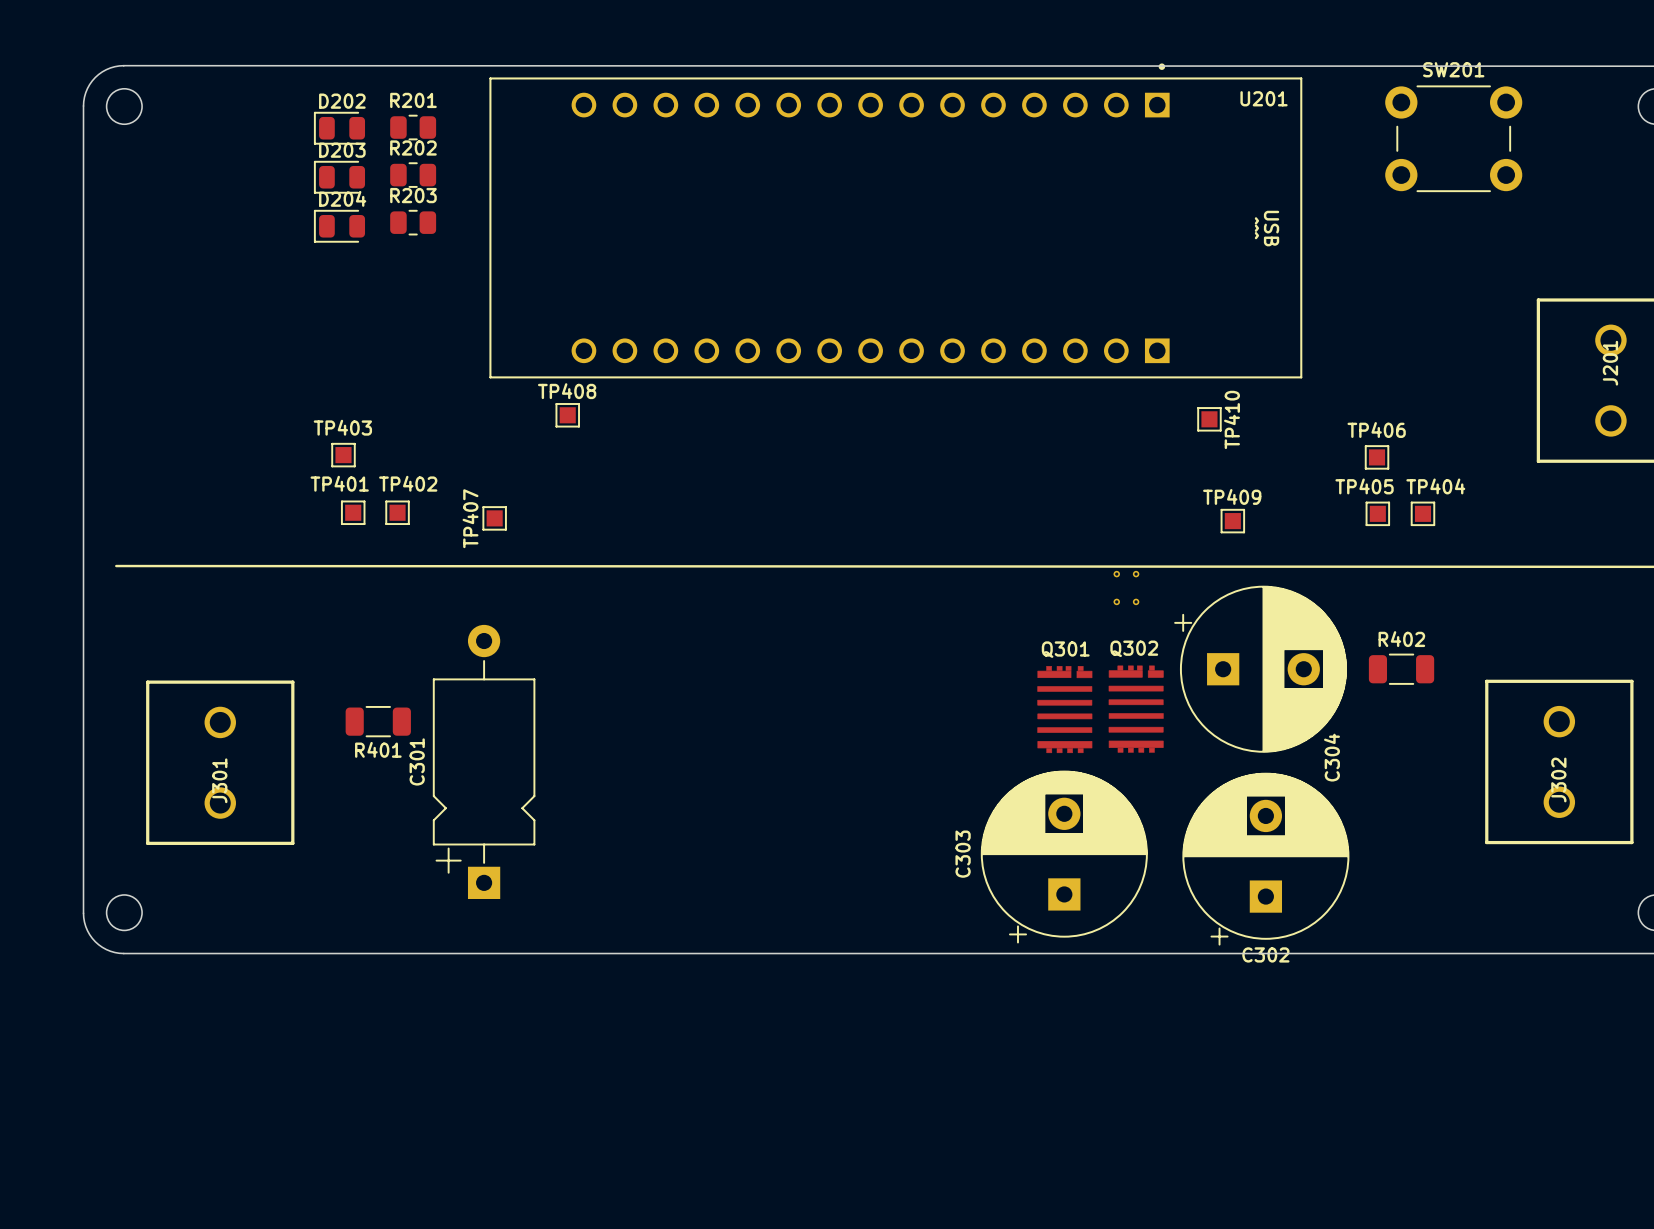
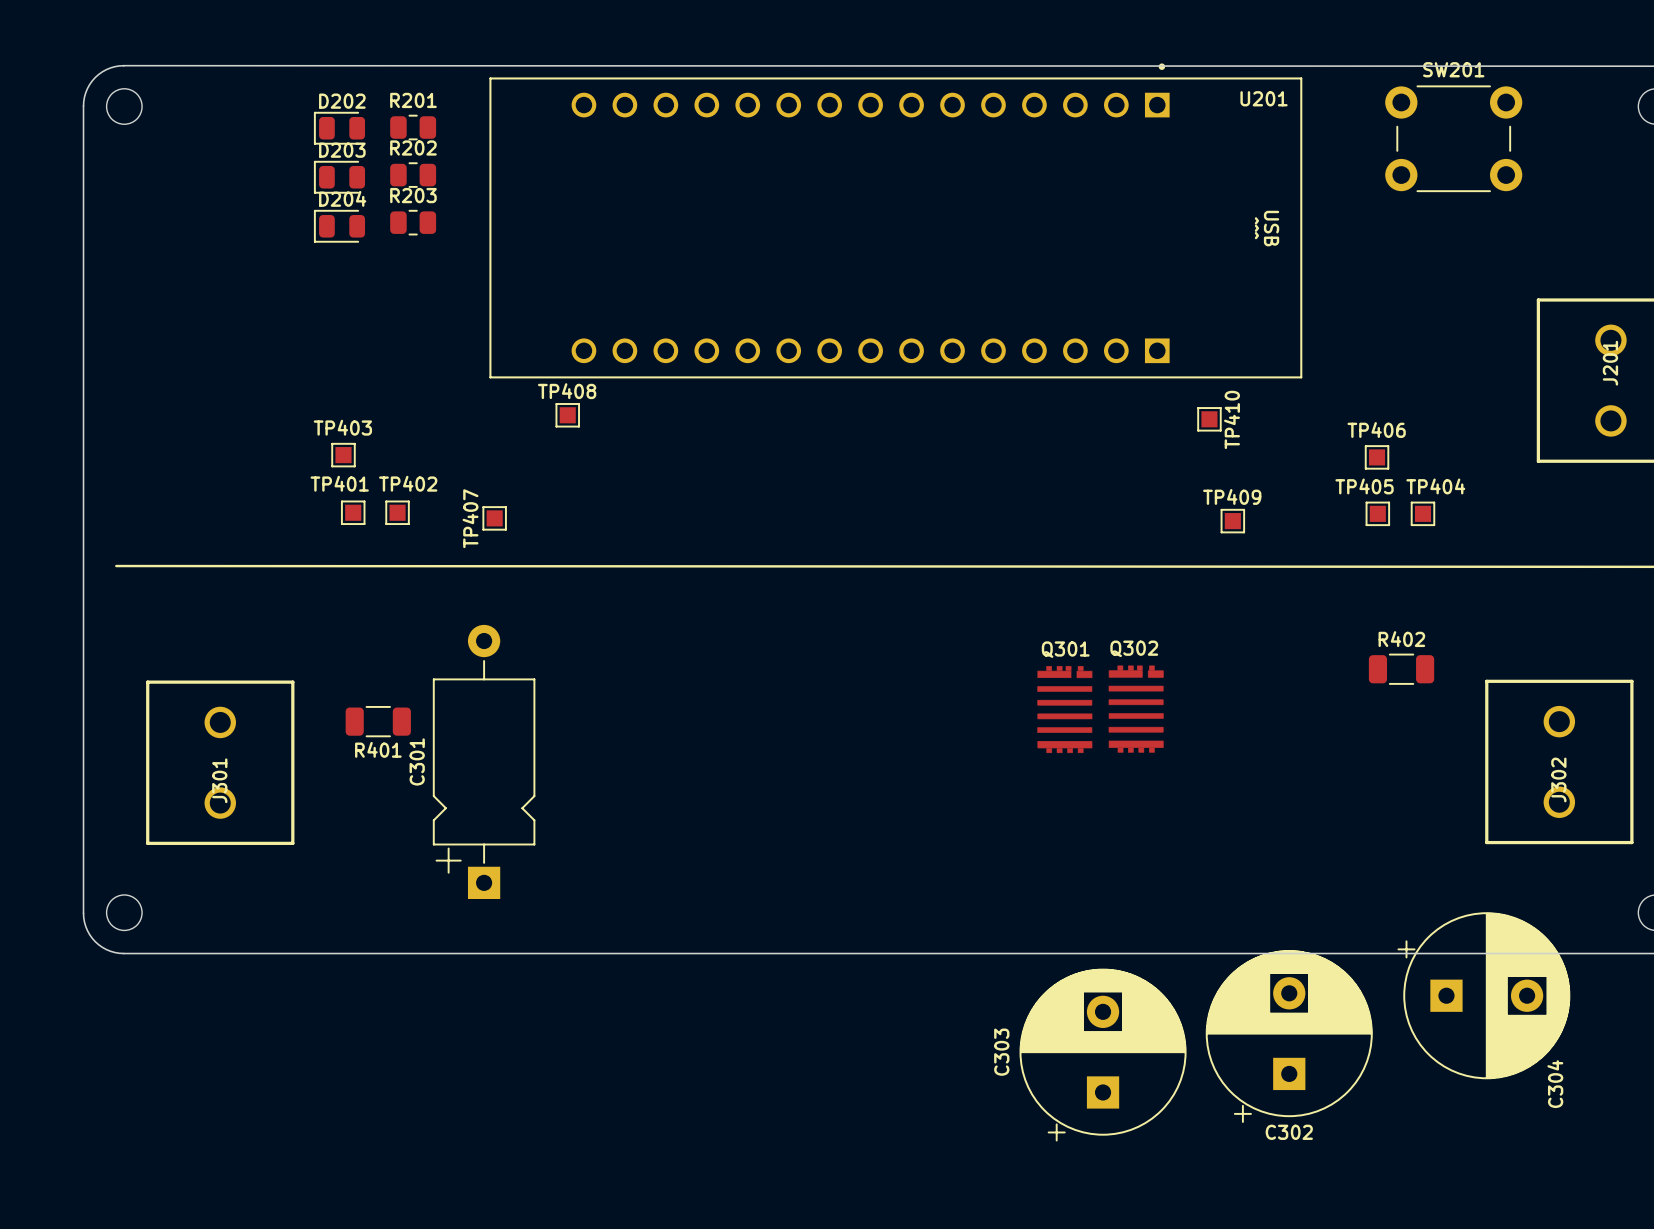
part: (1126, 588) -> none
C304 position: (1260, 669) -> (1483, 995)
C303 position: (1064, 857) -> (1103, 1055)
C302 position: (1265, 859) -> (1289, 1036)

